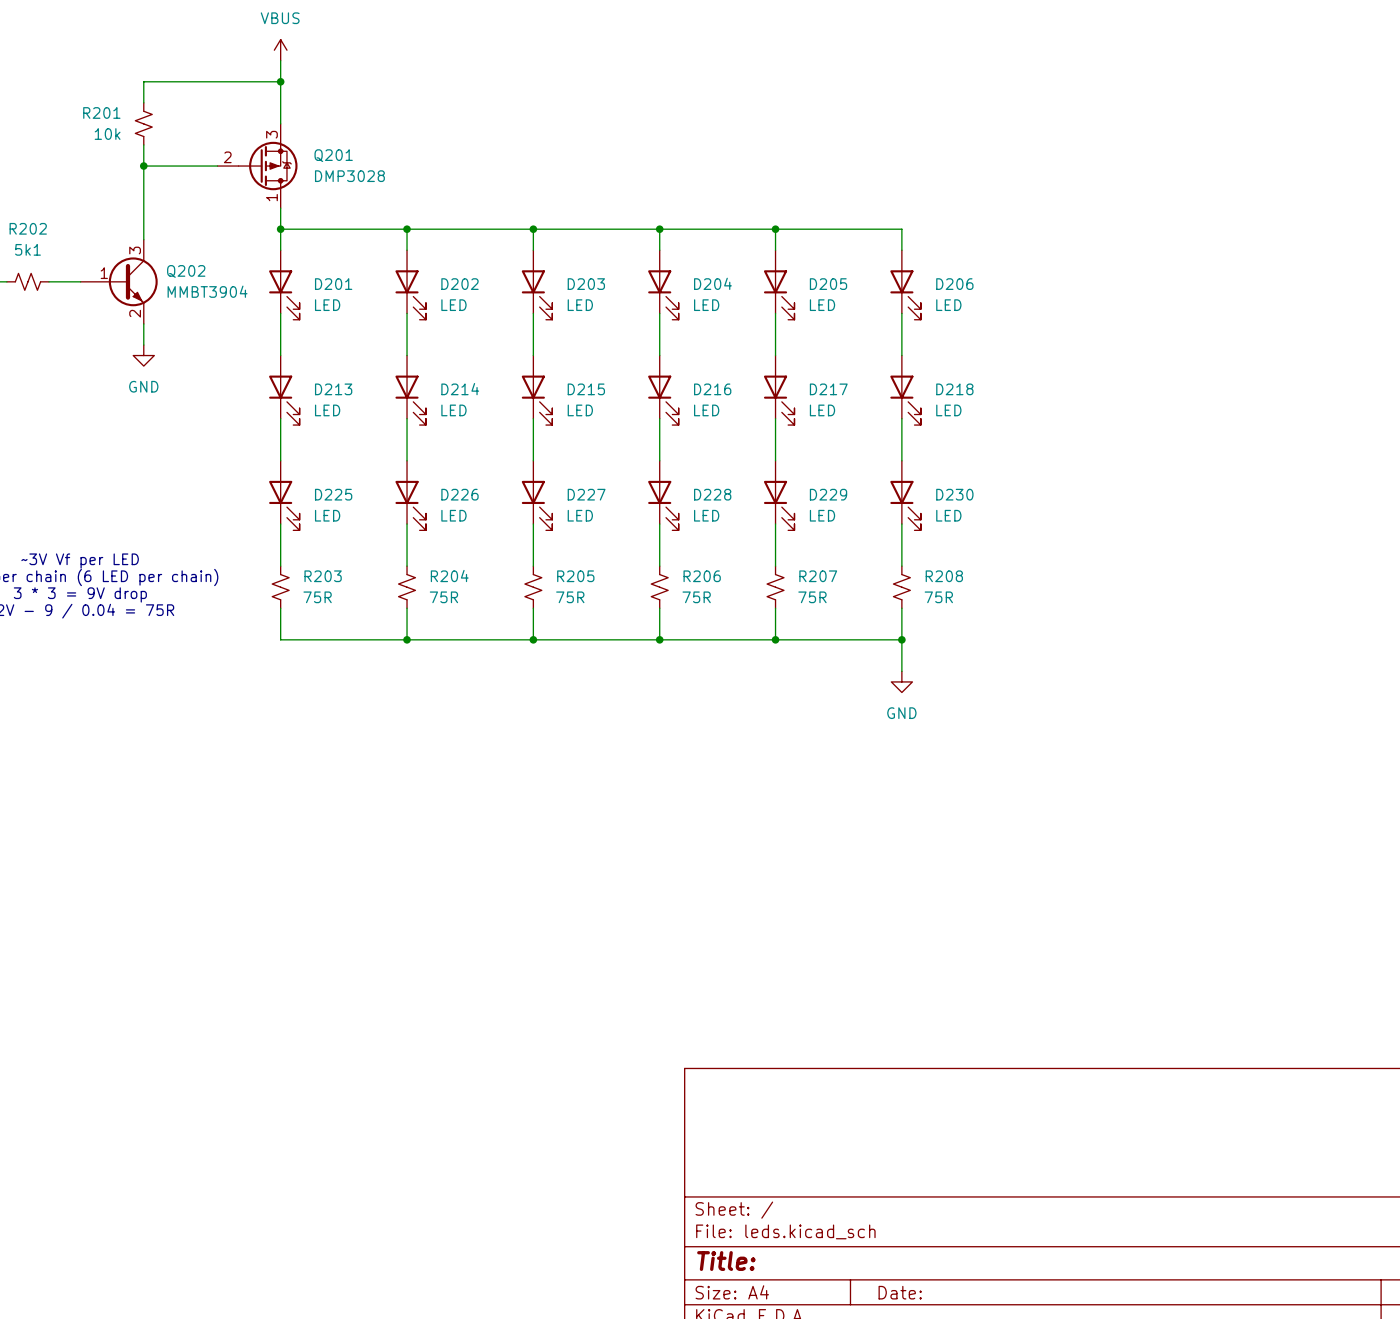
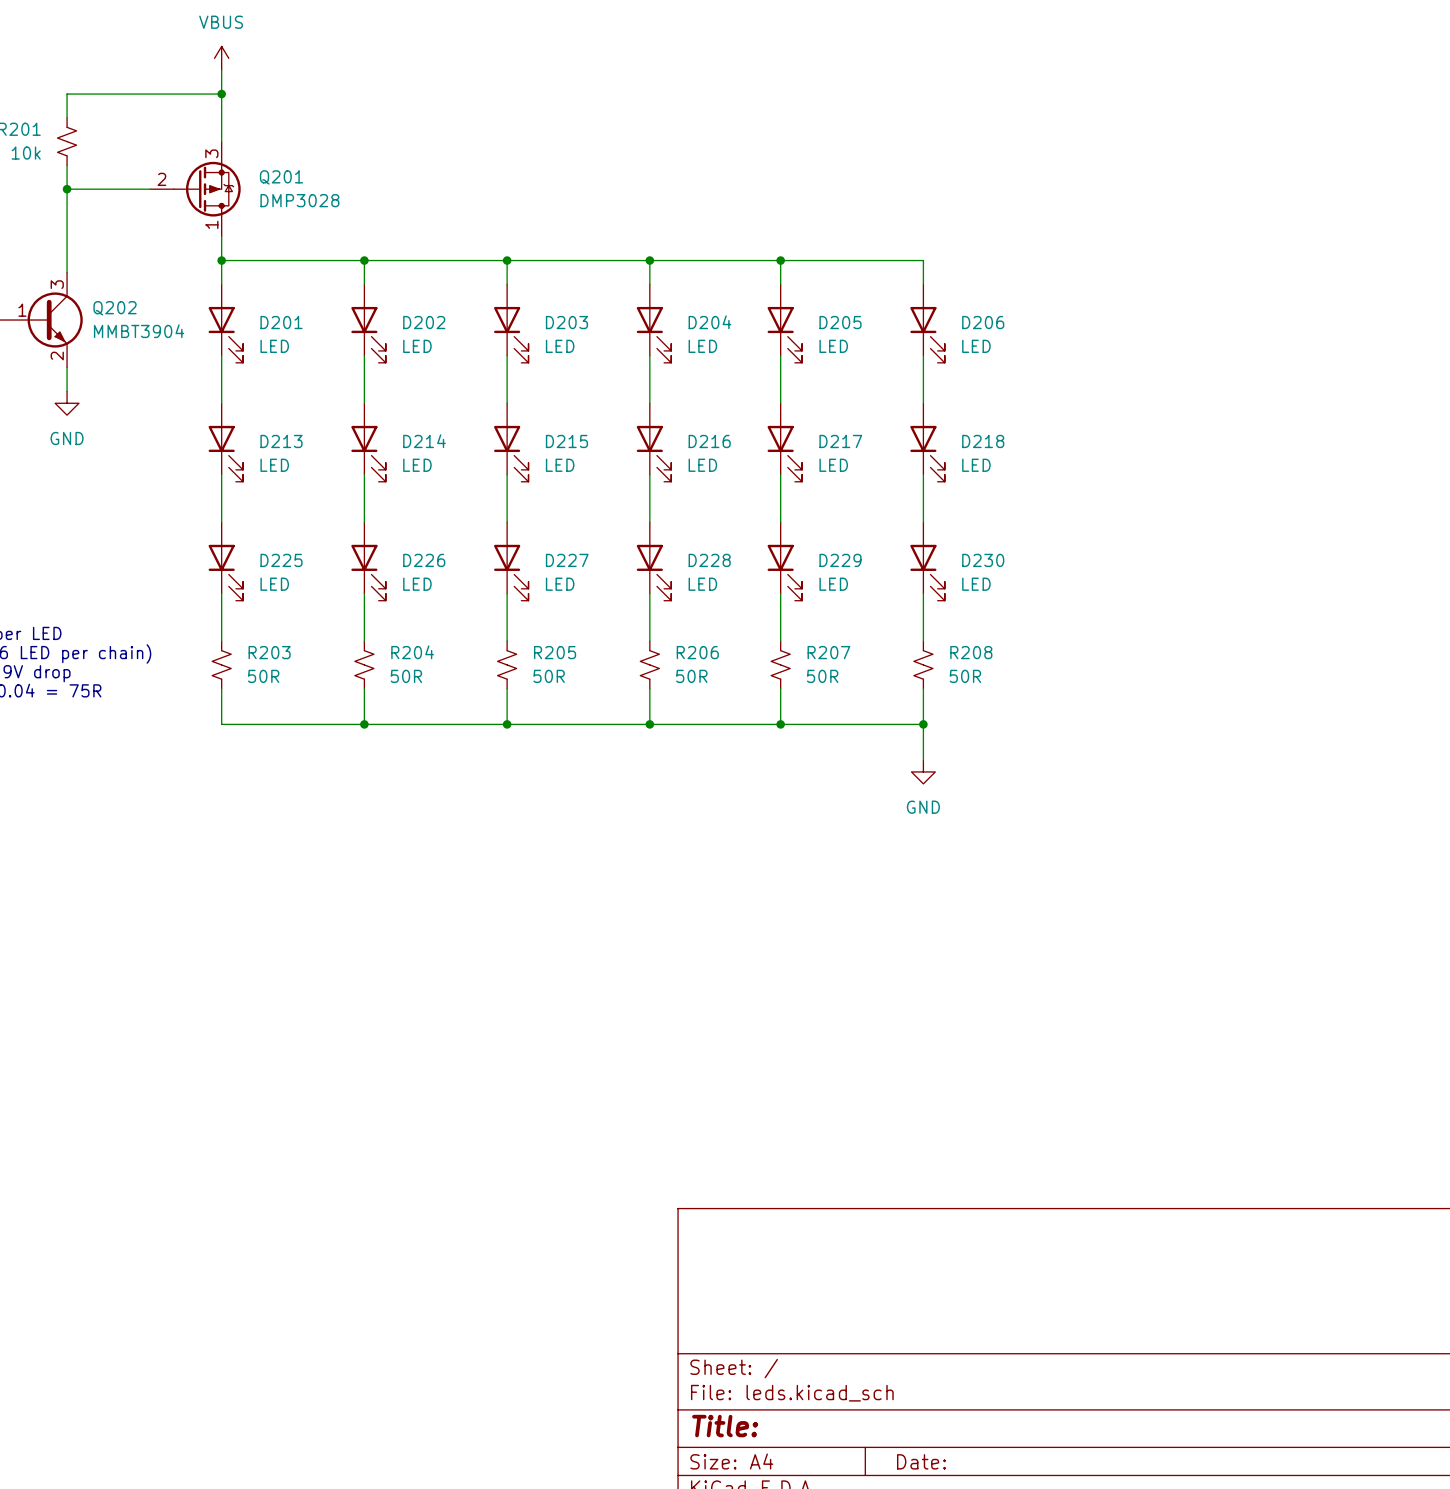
R203 value: 75R (317, 597) -> 50R (263, 676)
R204 value: 75R (443, 597) -> 50R (406, 676)
R205 value: 75R (570, 597) -> 50R (549, 676)
R206 value: 75R (696, 597) -> 50R (691, 676)
R207 value: 75R (812, 597) -> 50R (822, 676)
R208 value: 75R (938, 597) -> 50R (965, 676)

